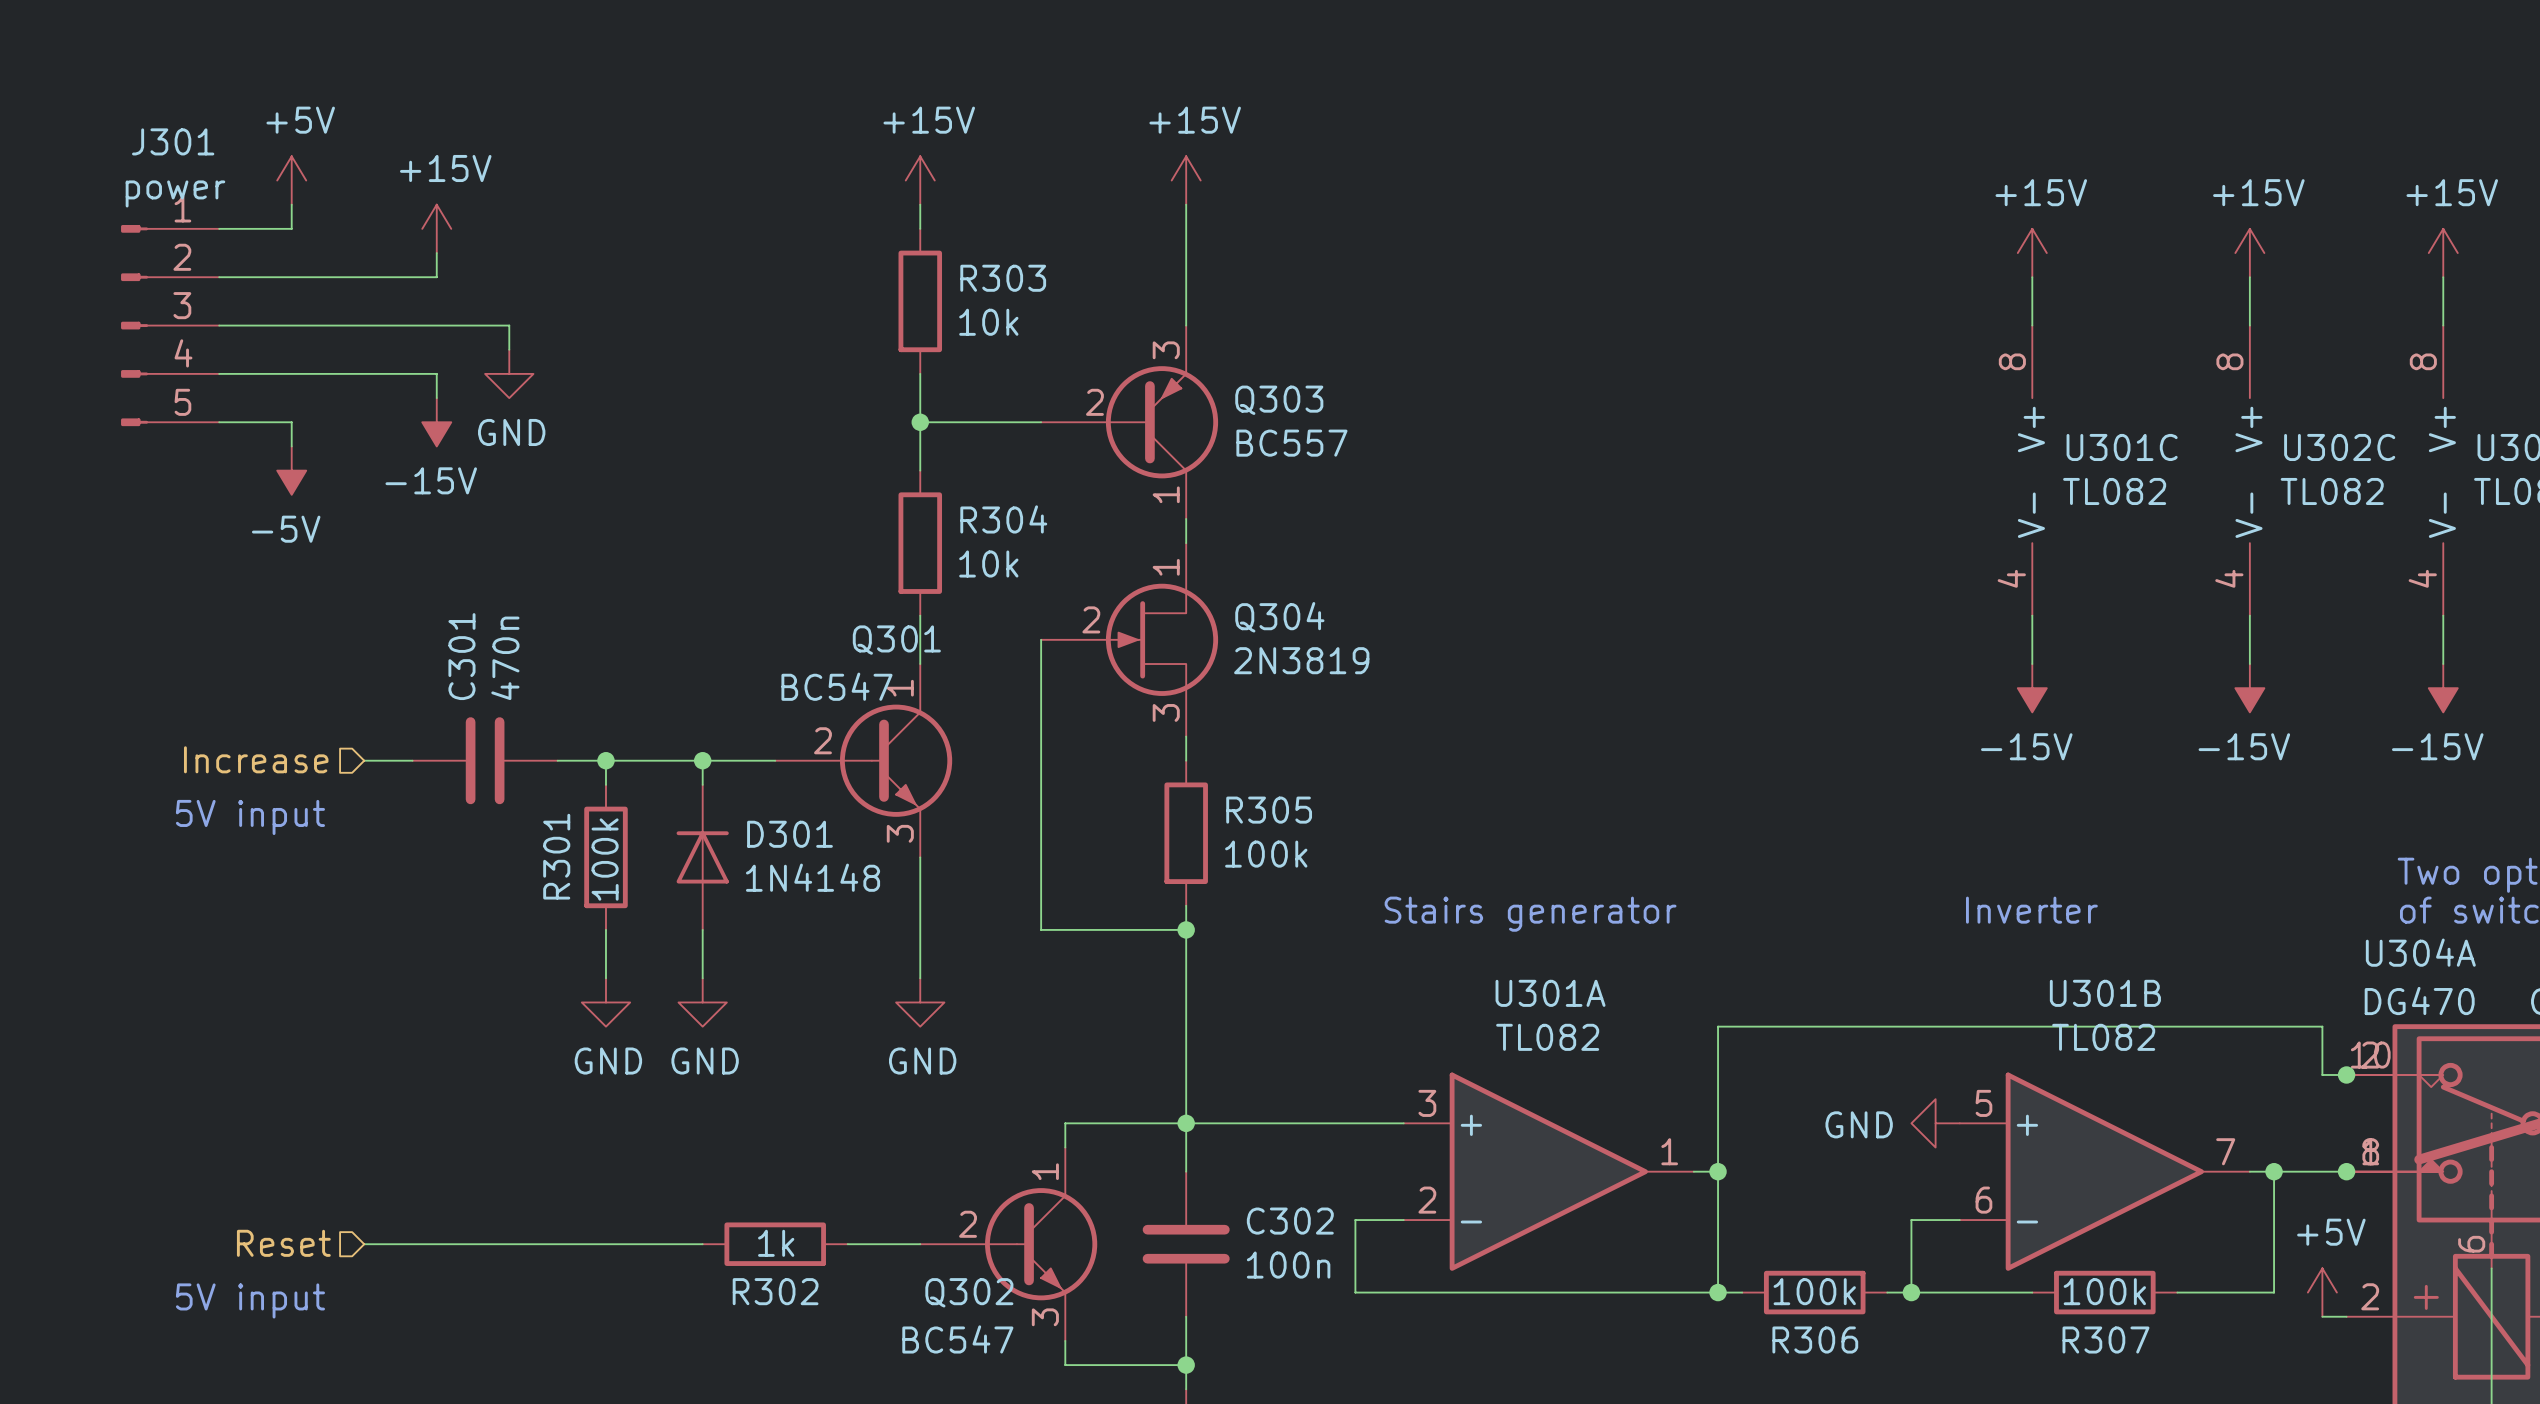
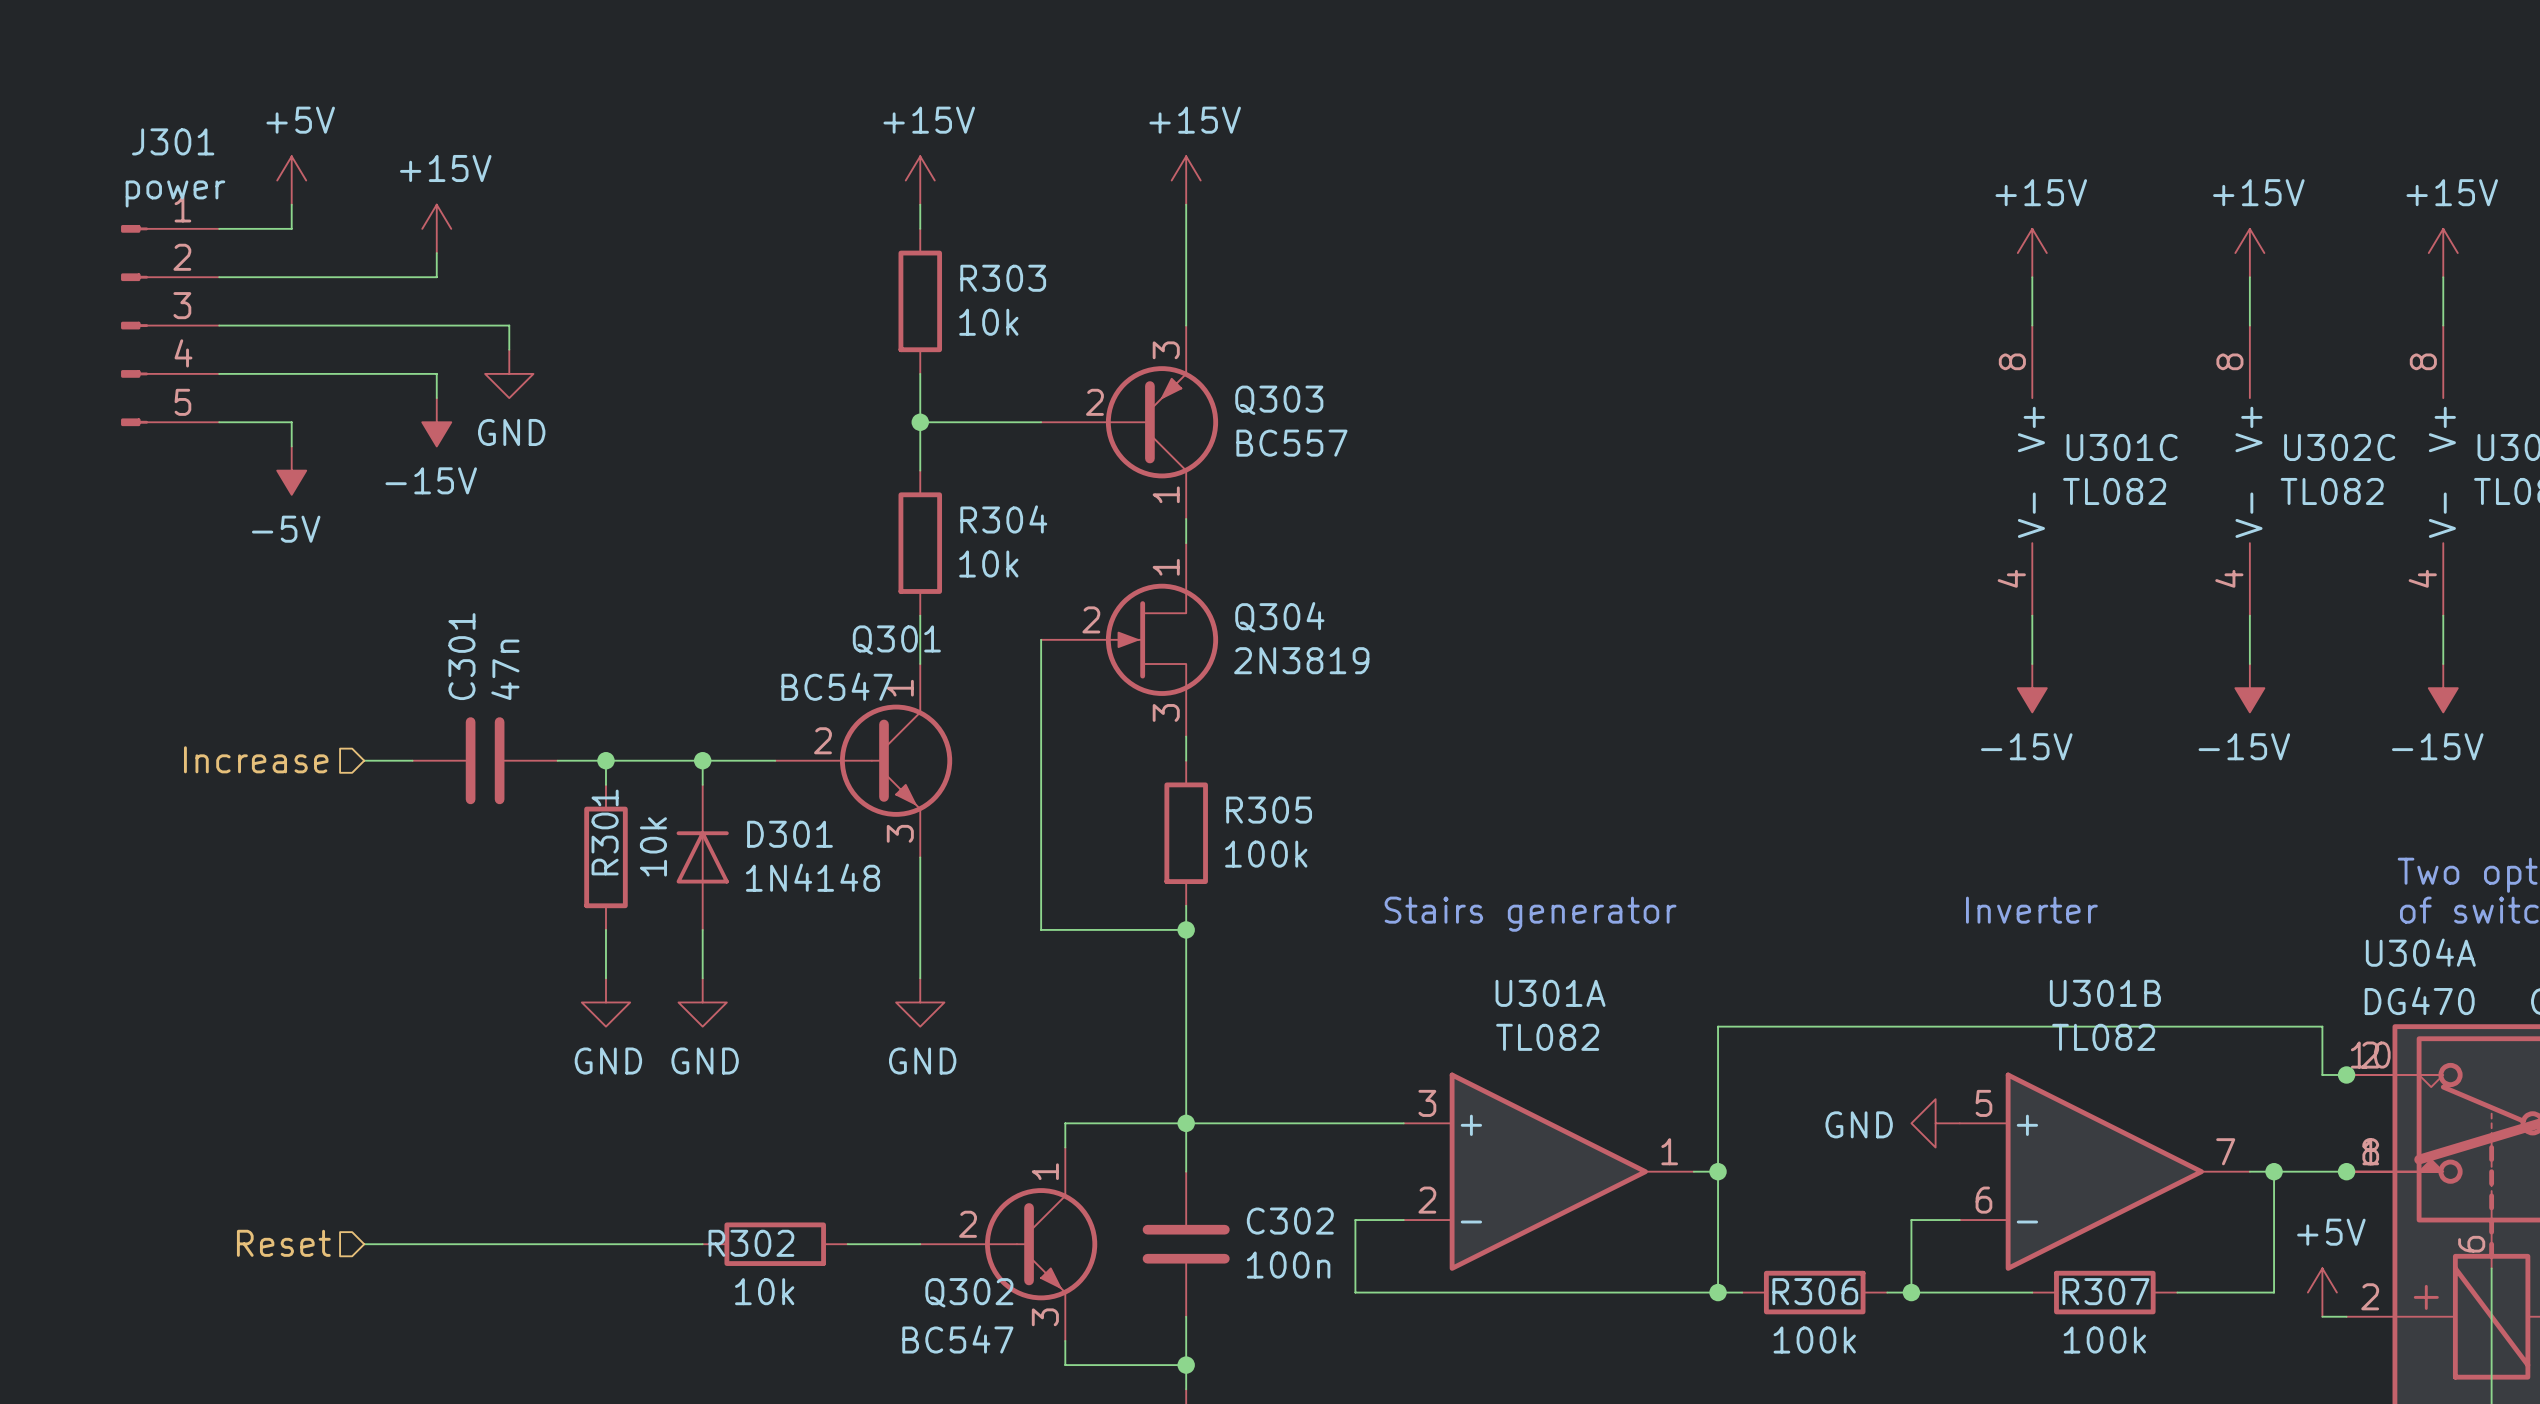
C301 value: 470n (505, 658) -> 47n (505, 669)
text: 5V input (250, 817) -> none
R301 name position: R301 (556, 856) -> R301 (605, 832)
R301 value: 100k (605, 859) -> 10k (653, 846)
R302 value: 1k (776, 1243) -> 10k (764, 1291)
R302 name position: R302 (775, 1291) -> R302 (751, 1243)
R306 value position: 100k (1814, 1291) -> 100k (1814, 1340)
R307 value position: 100k (2104, 1291) -> 100k (2104, 1340)
text: 5V input (250, 1300) -> none
R306 name position: R306 (1815, 1340) -> R306 (1815, 1291)
R307 name position: R307 (2105, 1340) -> R307 (2105, 1291)

